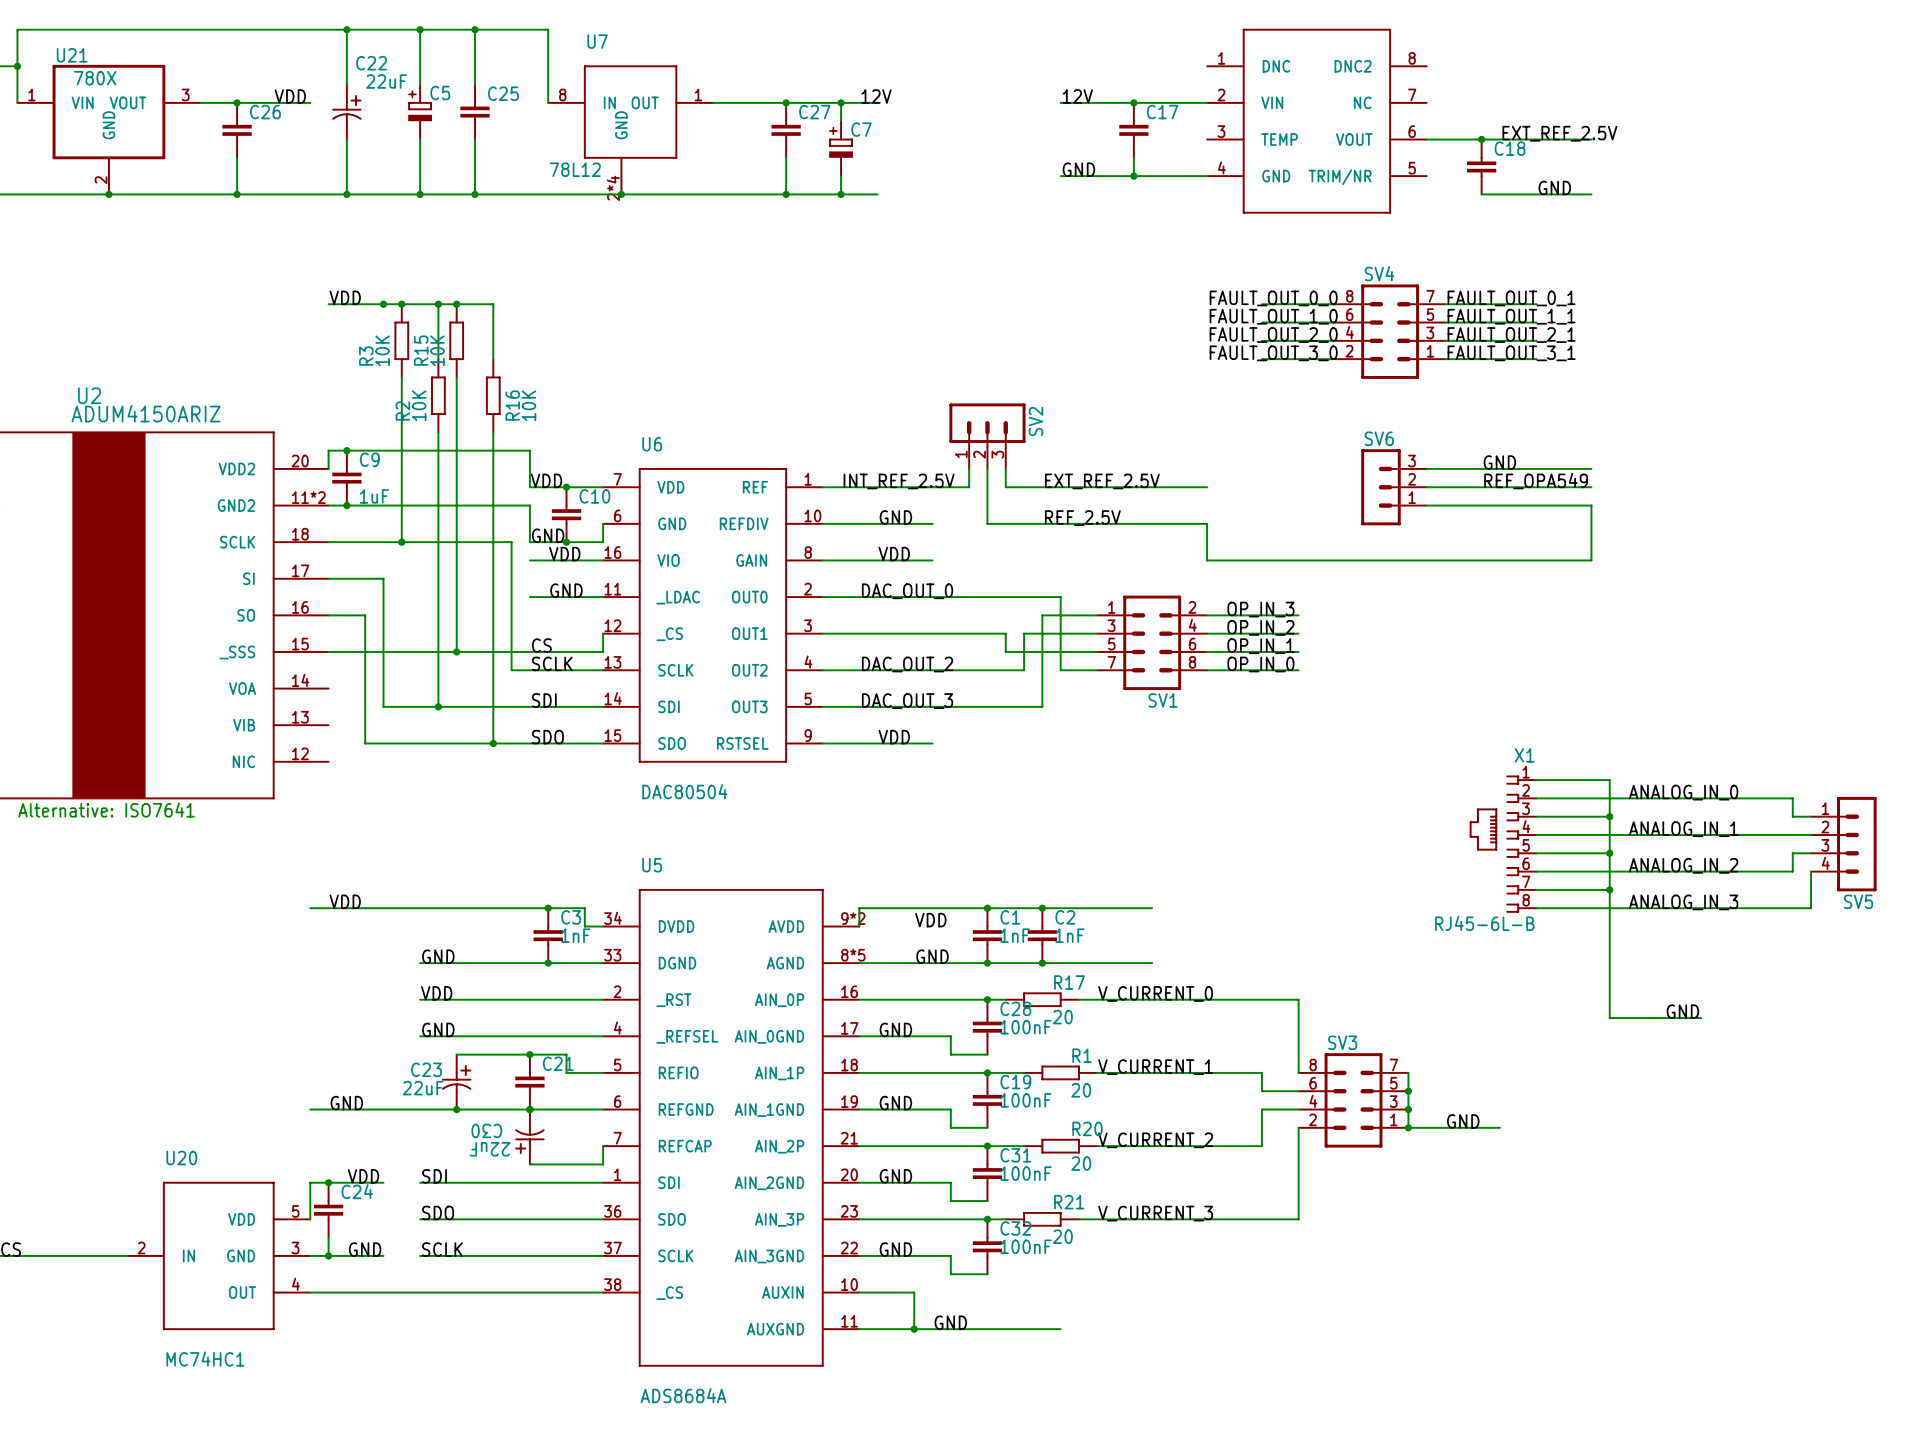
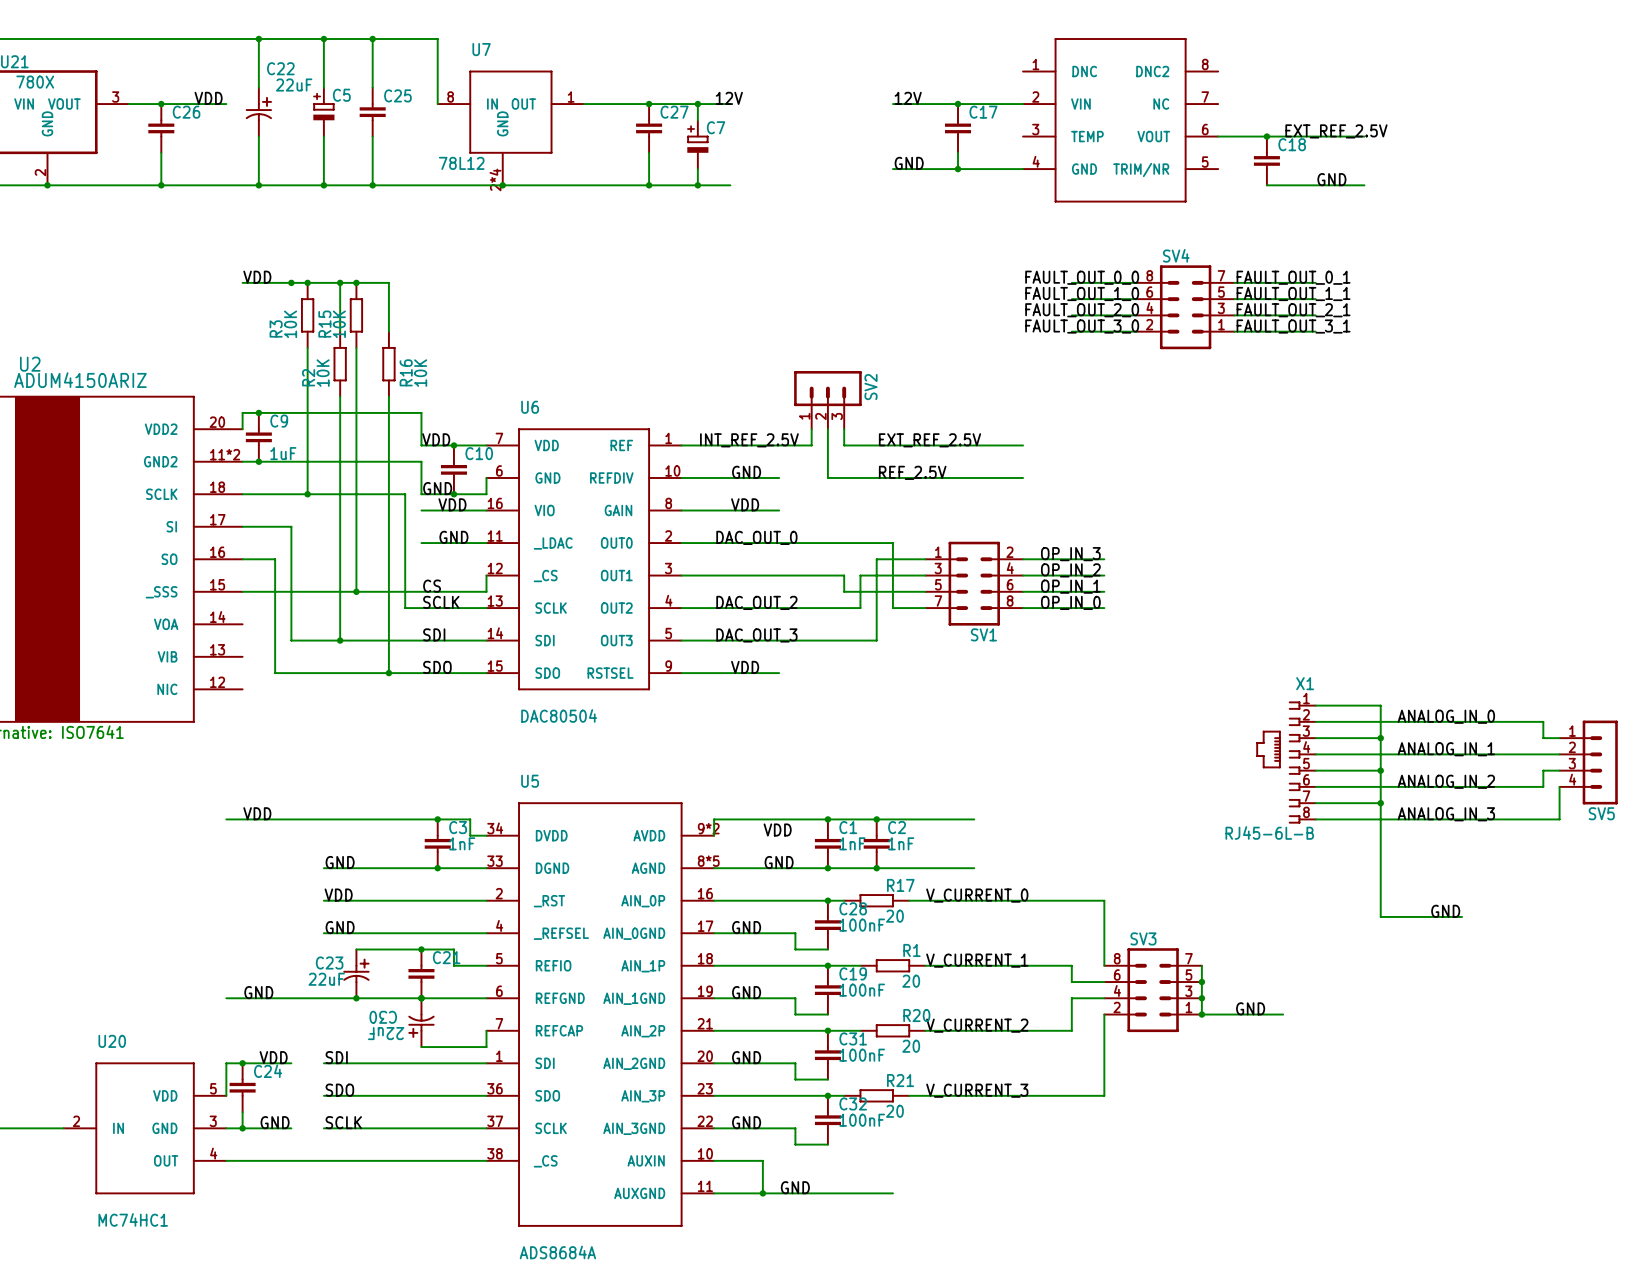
label: GND (1499, 462) -> none
wire: (1426, 468) (1591, 468) -> none
label: REF_OPA549 (1536, 481) -> none
SV6: (1393, 487) -> none
wire: (1426, 487) (1591, 487) -> none
wire: (1426, 505) (1591, 505) (1591, 560) (1207, 560) (1207, 523) -> none

